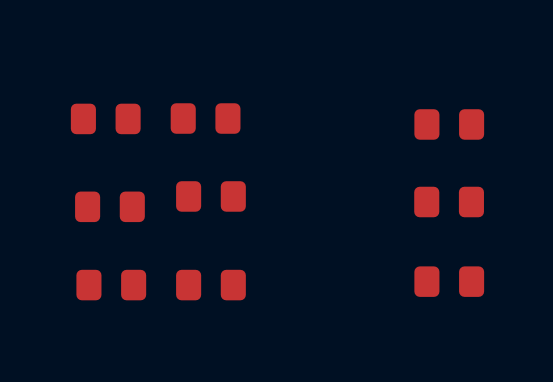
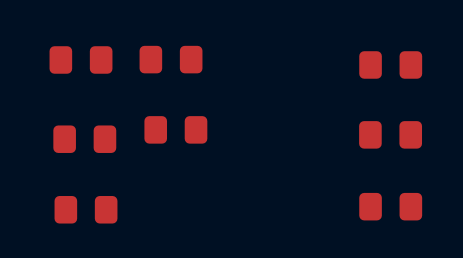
part: (210, 285) -> none

